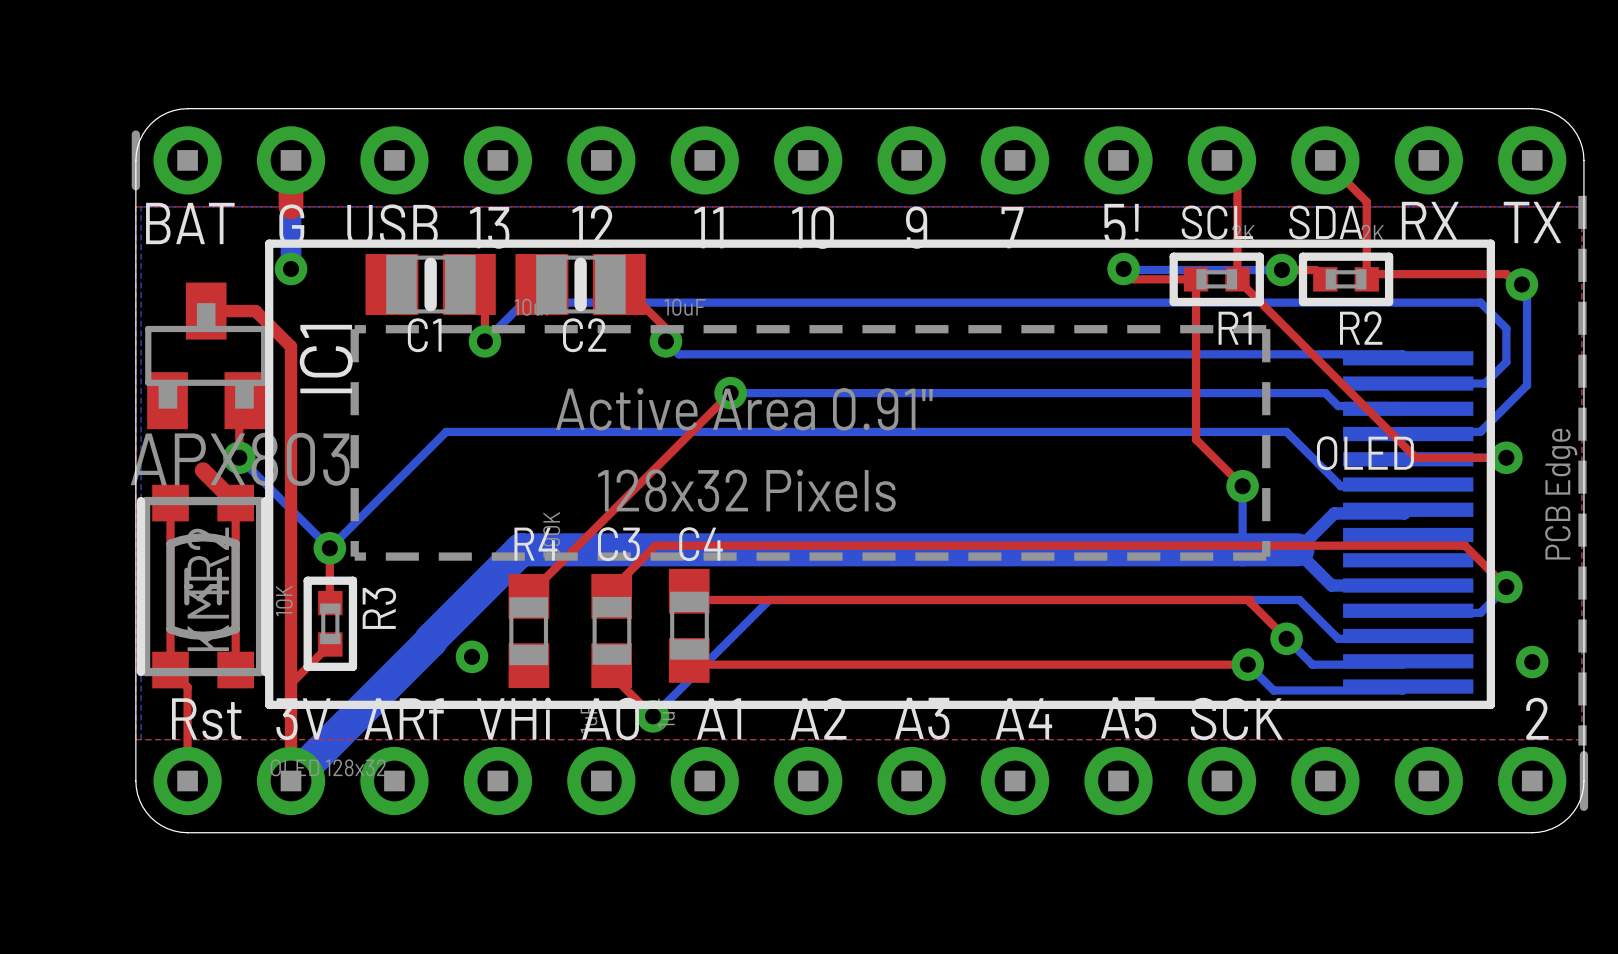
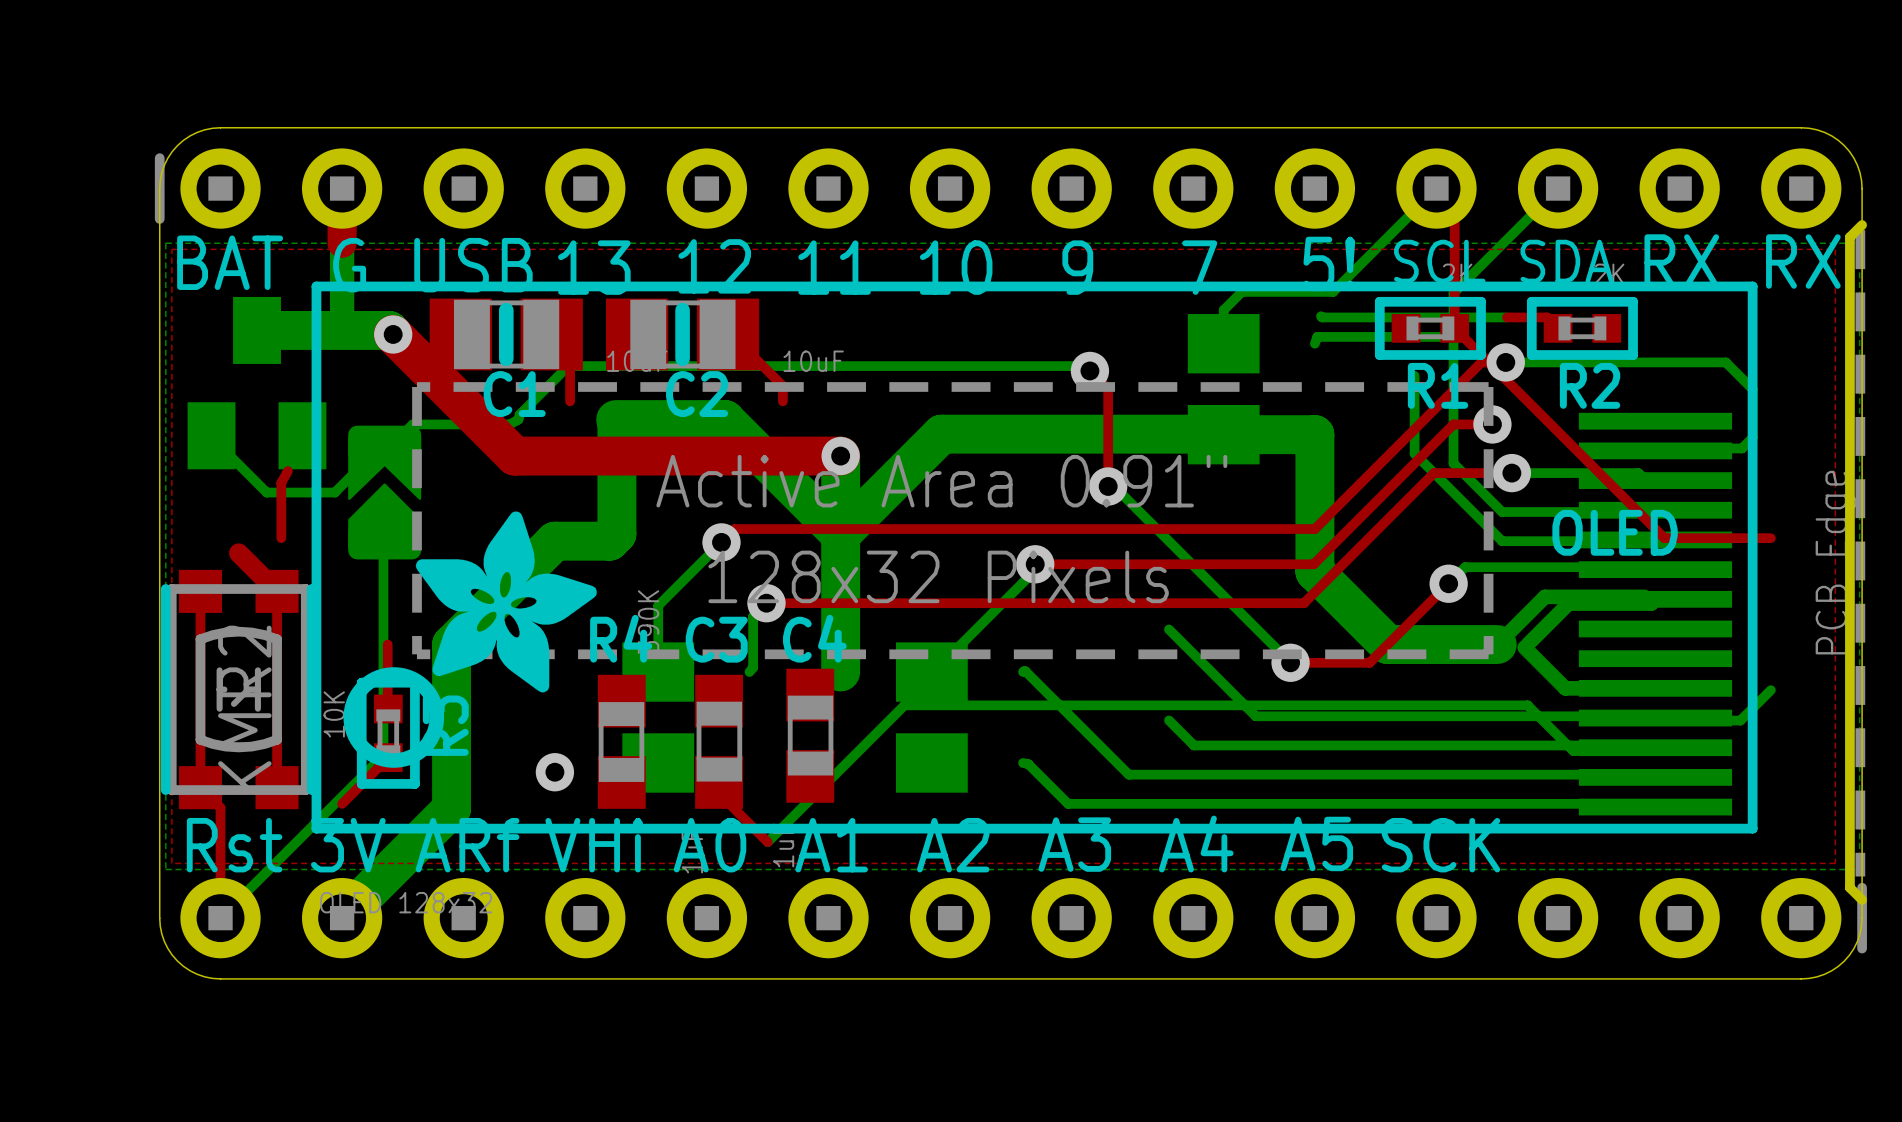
bottom track: none -> (1436, 188) (1333, 291) (1241, 291) (1223, 310) (1223, 343)
top track: (1325, 160) (1366, 201) (1366, 279) (1371, 274) (1506, 274) (1516, 284) (1521, 284) -> none
bottom track: none -> (1558, 188) (1453, 293) (1453, 463) (1502, 512) (1638, 512) (1644, 507)
board edge: none -> (1862, 225) (1849, 237) (1849, 887) (1862, 899)
top zone outline: (135, 206) (1581, 206) (1581, 739) (135, 739) (135, 206) -> (171, 249) (171, 863) (1835, 863) (1835, 249) (171, 249)
text: TX (1532, 222) -> RX (1803, 261)
via position: (291, 269) -> (393, 334)
top track: (1123, 269) (1134, 279) (1196, 279) (1196, 439) (1242, 486) -> none
via: (1123, 269) -> none
via position: (1281, 270) -> (1505, 362)
bottom track: none -> (257, 330) (389, 330) (393, 334)
top track: none -> (393, 334) (514, 456) (840, 456)
bottom track: (1521, 284) (1521, 294) (1527, 300) (1527, 385) (1480, 431) (1415, 431) (1408, 434) -> none
via: (1521, 284) -> none
bottom track: none -> (1453, 336) (1317, 336) (1314, 343)
top track: none -> (1505, 362) (1481, 362) (1314, 529) (734, 529) (721, 542)
bottom track: none -> (1505, 362) (1725, 362) (1752, 389) (1752, 437) (1742, 448) (1644, 448)
top track: (206, 311) (255, 311) (291, 346) (291, 781) -> none
top track: none -> (1089, 370) (1108, 389) (1108, 486)
bottom track: none -> (1089, 370) (1085, 366) (568, 366) (519, 414) (518, 419) (509, 424) (412, 424) (393, 443) (383, 443) (334, 492) (266, 492) (211, 435)
via: none -> (1089, 370)
bottom track: none -> (1414, 375) (1414, 453) (1502, 541) (1638, 541) (1644, 537)
part: none -> (257, 383)
part: none -> (1223, 389)
bottom track: (484, 341) (523, 302) (1480, 302) (1506, 328) (1506, 362) (1484, 383) (1408, 383) -> none
via: (484, 341) -> none
bottom track: (665, 341) (678, 354) (1402, 354) (1408, 358) -> none
via: (665, 341) -> none
IC1: APX803 (206, 355) -> none
top track: none -> (1492, 424) (1453, 424) (1313, 564) (1035, 564)
via: none -> (1492, 424)
bottom track: none -> (840, 456) (840, 672)
top track: (730, 393) (528, 596) -> none
bottom track: (730, 393) (1325, 393) (1338, 406) (1402, 406) (1408, 408) -> none
via position: (730, 393) -> (840, 456)
top track: none -> (1511, 473) (1434, 473) (1303, 603) (766, 603)
bottom track: none -> (1511, 473) (1638, 473) (1644, 478)
via: none -> (1511, 473)
bottom track: none -> (1108, 486) (1114, 486) (1290, 662)
via: none -> (1108, 486)
part: none -> (384, 492)
drawing: none -> [343, 511, 597, 768]
bottom track: (239, 457) (329, 548) (446, 431) (1286, 431) (1340, 486) (1406, 486) (1408, 484) -> none
via: (239, 457) -> none
via: (1506, 457) -> none
bottom track: none -> (384, 541) (383, 755) (220, 918)
bottom track: none -> (721, 542) (658, 605) (658, 672)
via: none -> (721, 542)
bottom track: none -> (1035, 564) (1035, 570) (931, 672)
via: none -> (1035, 564)
bottom track: none -> (1644, 567) (1465, 567) (1448, 583)
bottom track: (1242, 486) (1242, 549) -> none
via position: (1242, 486) -> (1448, 583)
top track: none -> (1448, 583) (1369, 662) (1290, 662)
bottom track: none -> (766, 603) (753, 616) (753, 667) (749, 672)
via: none -> (766, 603)
bottom track: none -> (1168, 629) (1255, 716) (1648, 716) (1644, 715)
via: (329, 548) -> none
bottom track: (1297, 549) (520, 549) (384, 687) -> (1644, 596) (1544, 596) (1497, 644) (1387, 644) (1314, 571) (1314, 434) (941, 434) (840, 535) (725, 419) (615, 419) (616, 533) (609, 541) (554, 541) (451, 644) (451, 808)
via: none -> (1290, 662)
bottom track: none -> (1023, 672) (1025, 671) (1128, 774) (1644, 774)
top track: (1506, 587) (1465, 545) (655, 545) (614, 587) (611, 596) -> none
via: (1506, 587) -> none
top track: (689, 591) (691, 599) (1250, 599) (1250, 602) (1286, 638) -> none
part: none -> (658, 717)
part: none -> (931, 717)
bottom track: none -> (1168, 720) (1194, 745) (1644, 745)
bottom track: (1286, 638) (1312, 664) (1402, 664) (1408, 661) -> none
via: (1286, 638) -> none
bottom track: none -> (1023, 762) (1028, 764) (1068, 803) (1644, 804)
top track: (689, 660) (691, 664) (1247, 664) -> none
via: (1532, 662) -> none
bottom track: (1247, 664) (1273, 690) (1402, 690) (1408, 686) -> none
via: (1247, 664) -> none
via: (653, 716) -> none
text: 2 (1537, 718) -> none

